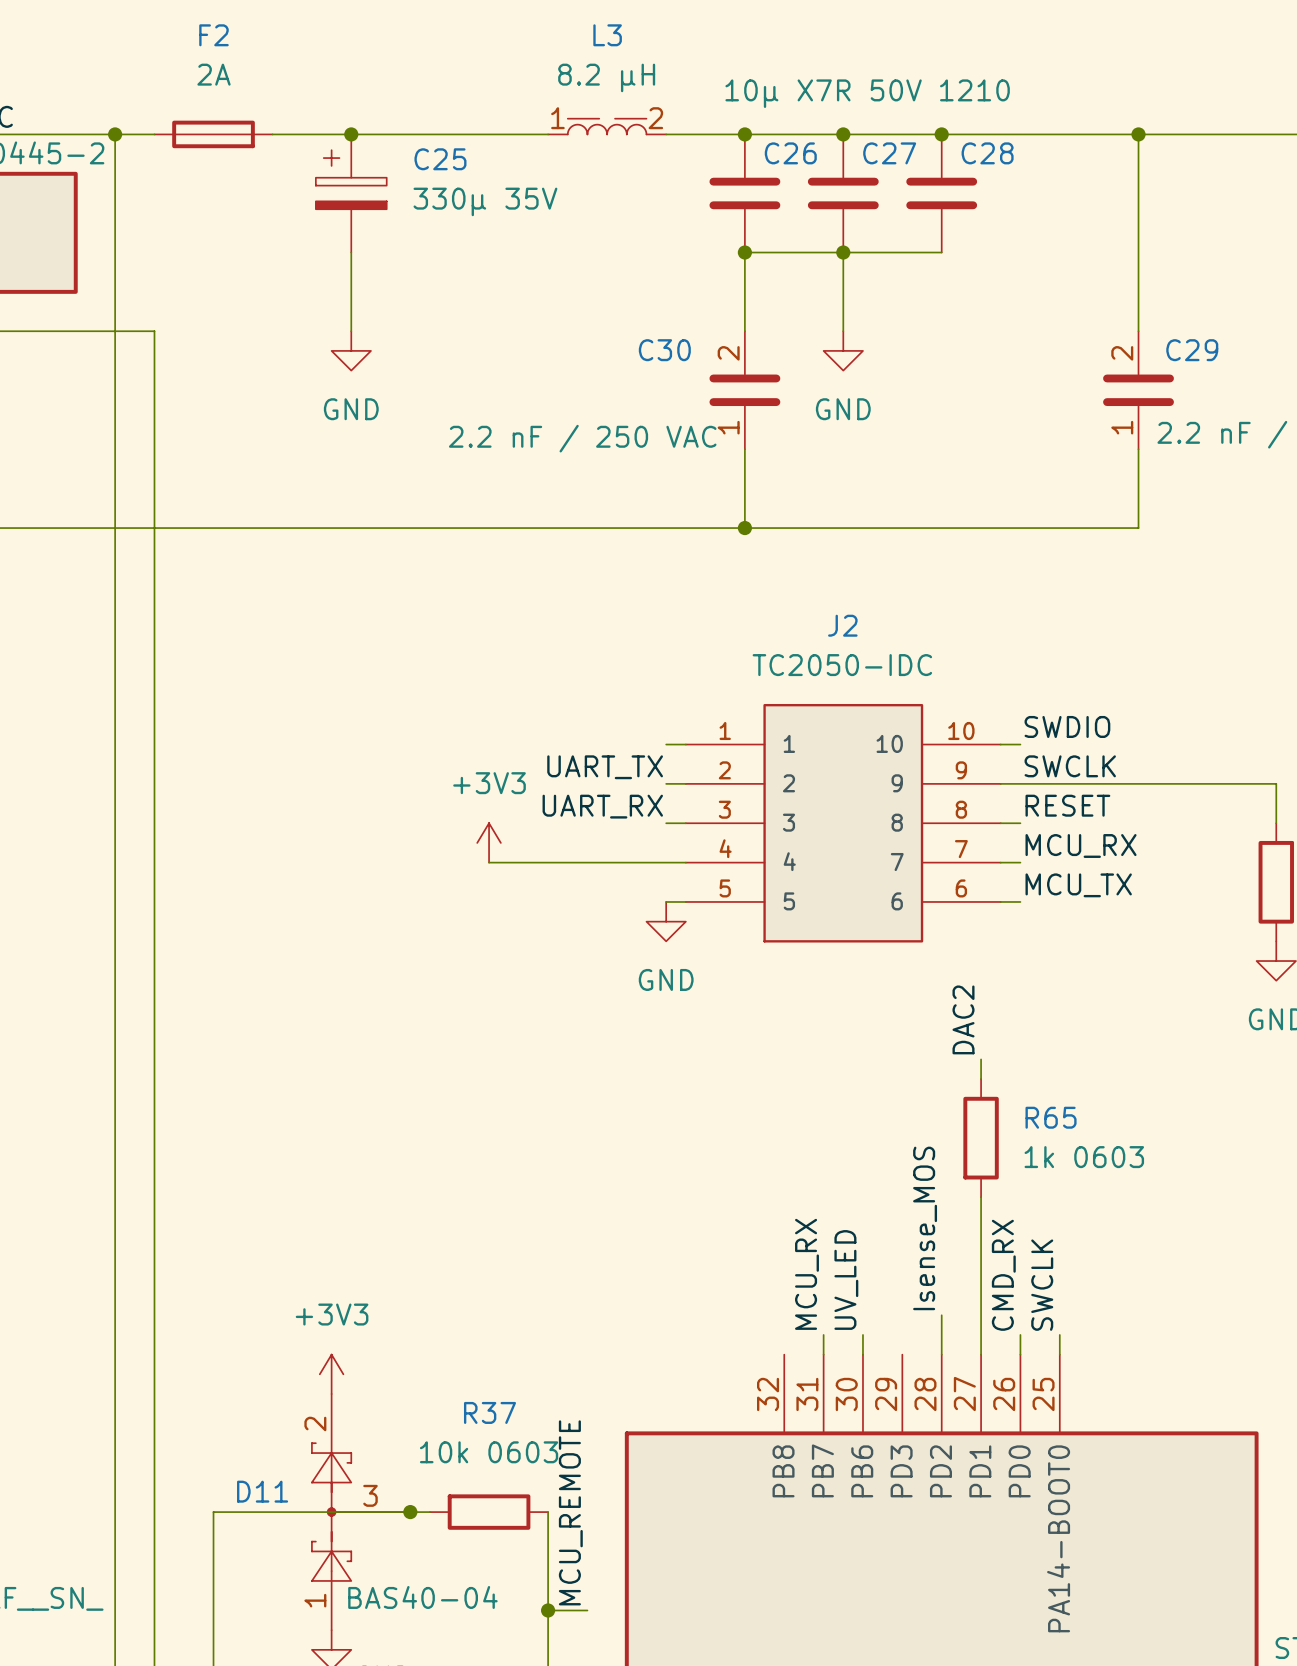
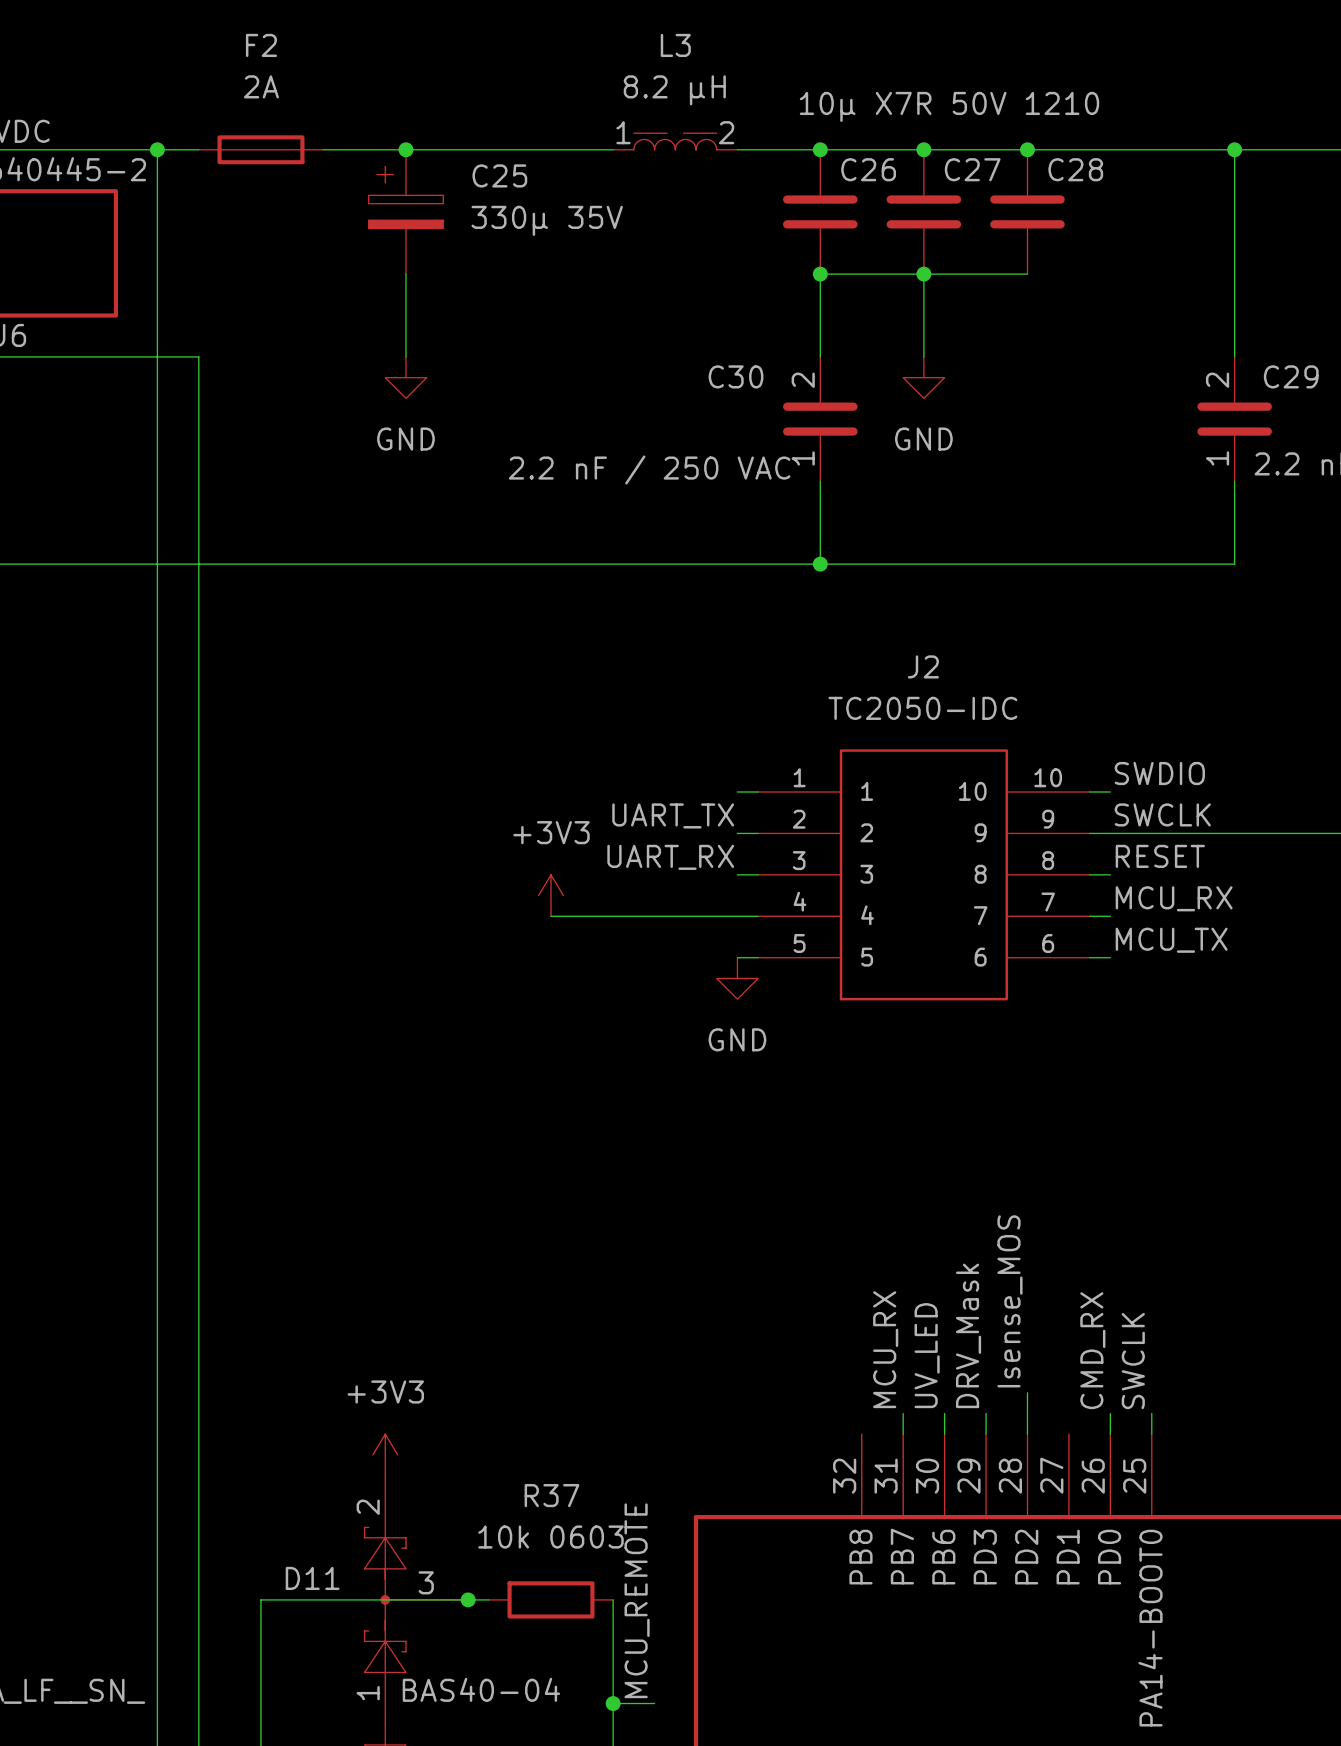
label: DAC2 (963, 1019) -> none
wire: (981, 1059) (981, 1079) -> (986, 1413) (986, 1434)
R65: 1k 0603 (981, 1138) -> none
wire: (981, 1197) (981, 1354) -> none
label: none -> DRV_Mask (968, 1335)

